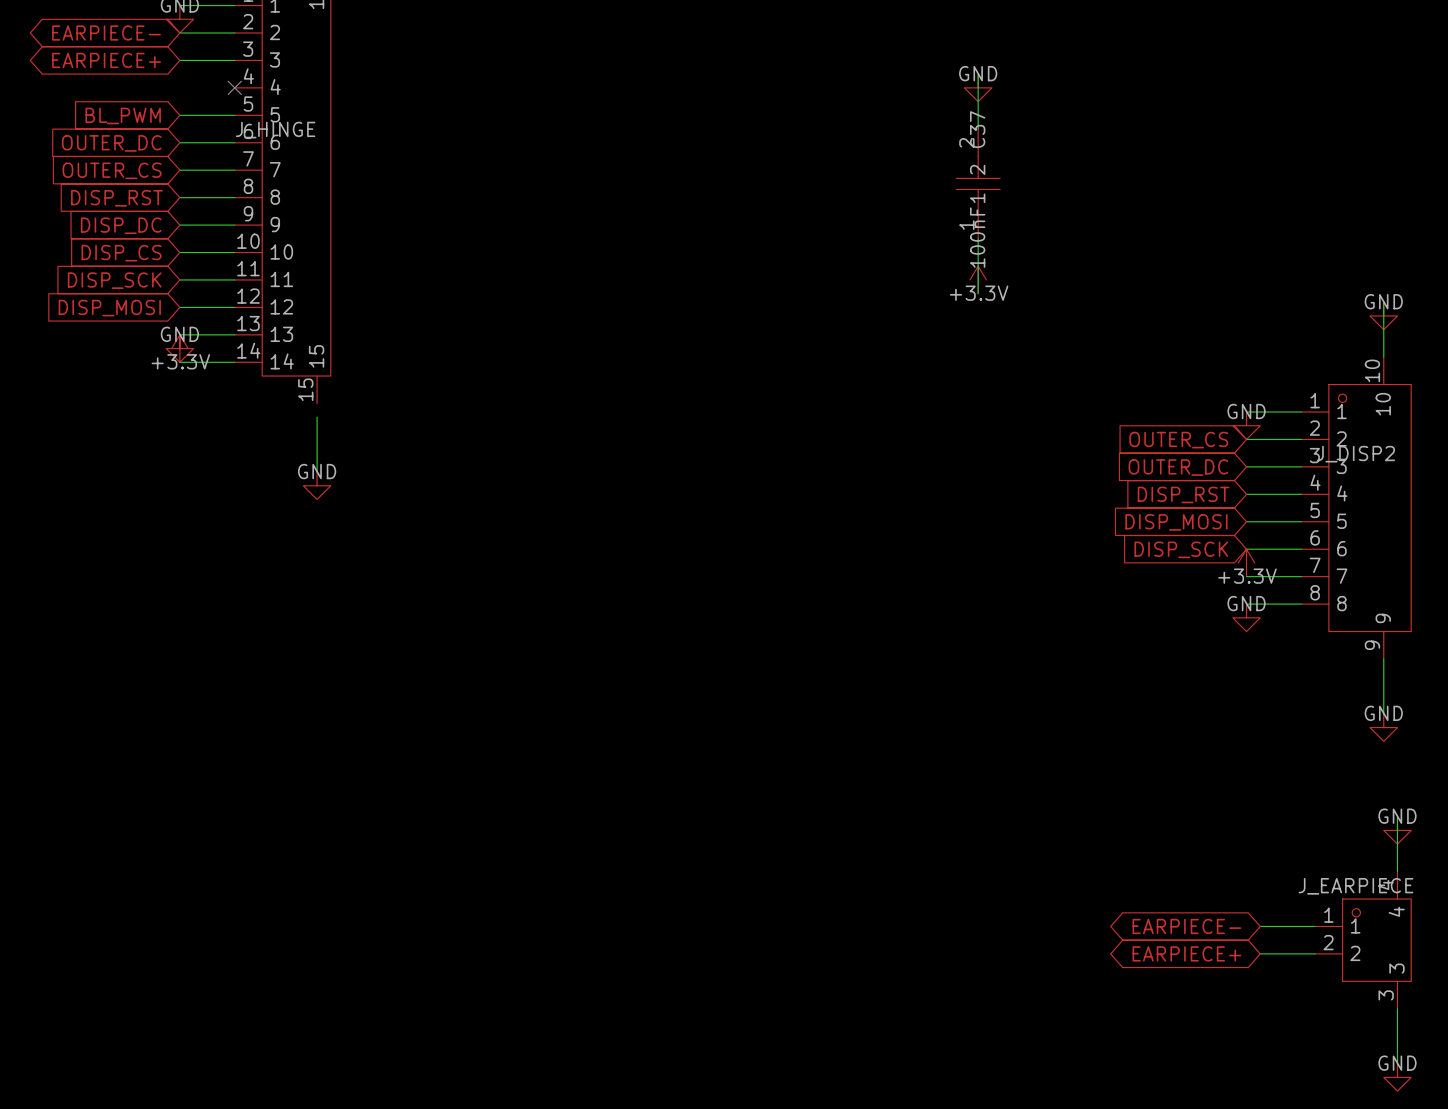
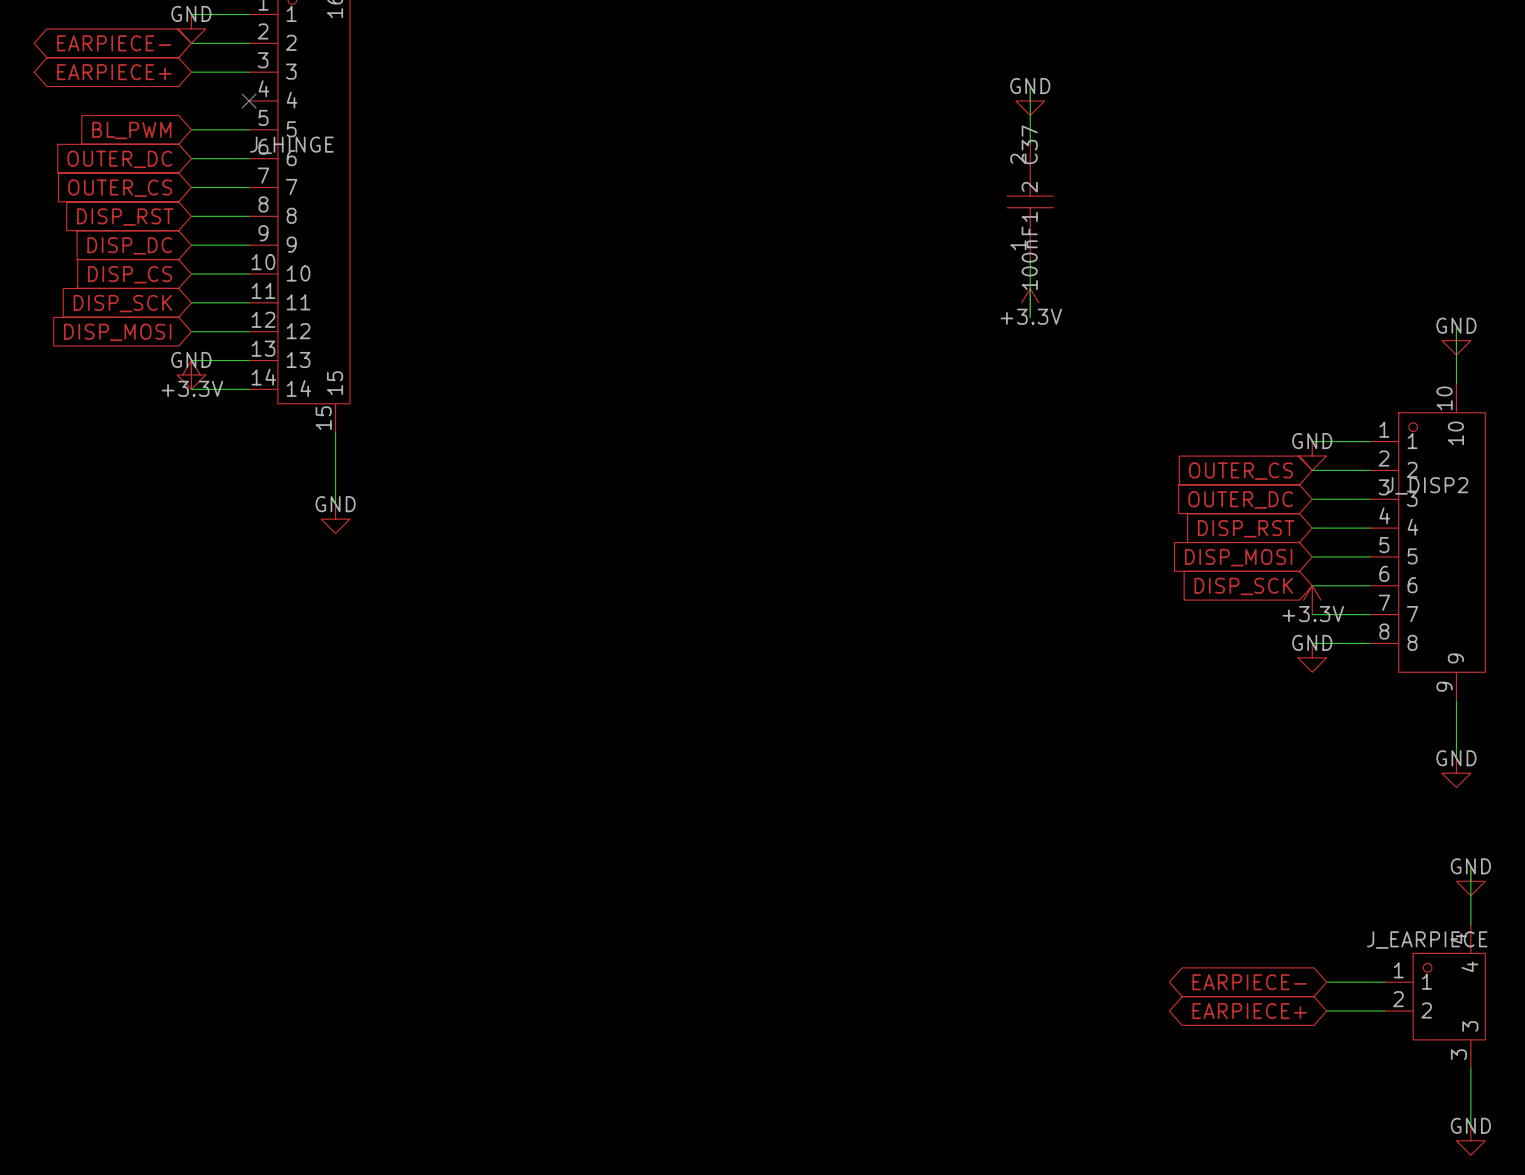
wire: none -> (335, 432) (335, 447)

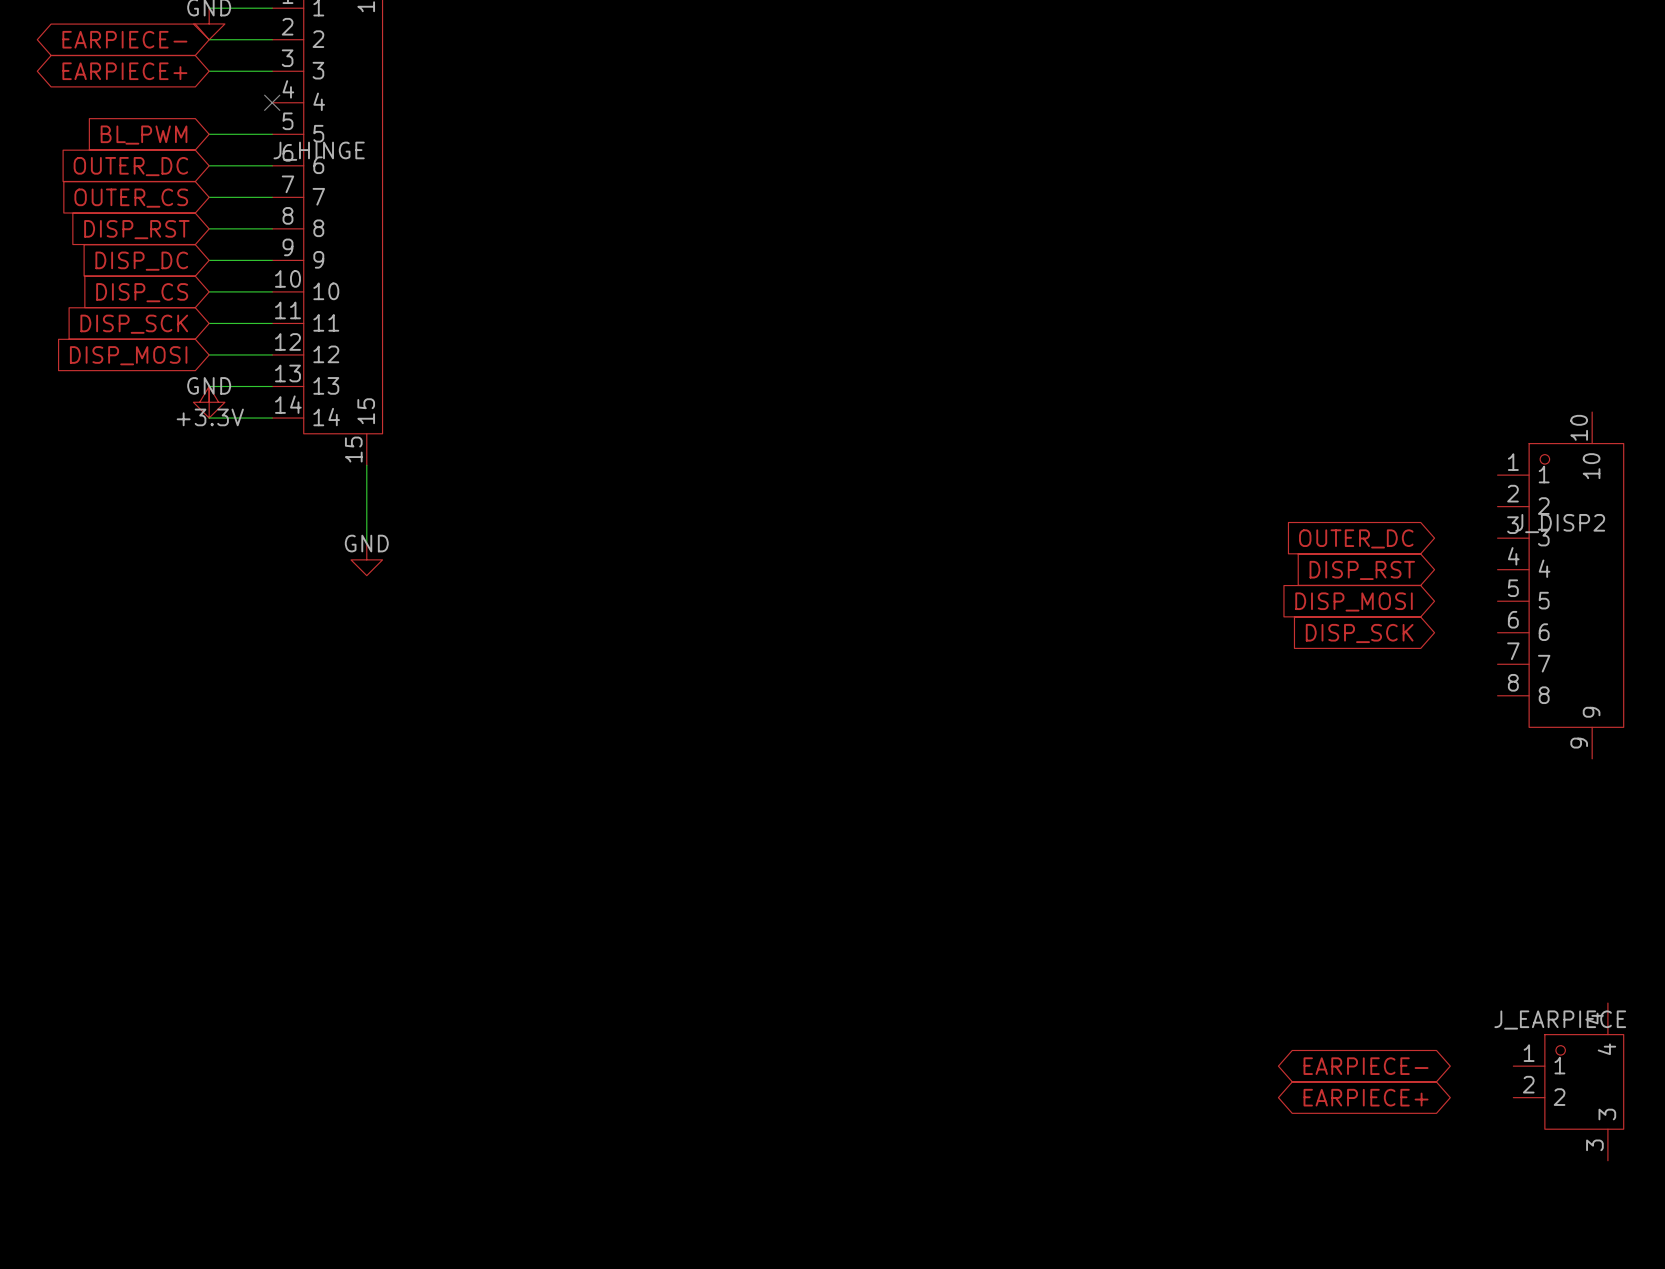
wire: (1030, 86) (1030, 144) -> none
power symbol: GND (1030, 101) -> none
C37: 100nF (1030, 201) -> none
wire: (1030, 259) (1030, 317) -> none
power symbol: +3.3V (1030, 302) -> none
wire: (1456, 326) (1456, 383) -> none
power symbol: GND (1456, 340) -> none
wire: (1312, 441) (1369, 441) -> none
power symbol: GND (1312, 456) -> none
wire: (1312, 470) (1369, 470) -> none
global label: OUTER_CS (1241, 471) -> none
wire: (1312, 499) (1369, 499) -> none
wire: (1312, 528) (1369, 528) -> none
wire: (1312, 556) (1369, 556) -> none
wire: (1312, 585) (1369, 585) -> none
power symbol: +3.3V (1312, 600) -> none
wire: (1312, 614) (1369, 614) -> none
wire: (1312, 643) (1369, 643) -> none
power symbol: GND (1312, 657) -> none
wire: (1456, 701) (1456, 758) -> none
power symbol: GND (1456, 773) -> none
wire: (1470, 866) (1470, 924) -> none
power symbol: GND (1470, 881) -> none
wire: (1326, 982) (1384, 982) -> none
wire: (1326, 1011) (1384, 1011) -> none
wire: (1470, 1068) (1470, 1126) -> none
power symbol: GND (1470, 1140) -> none

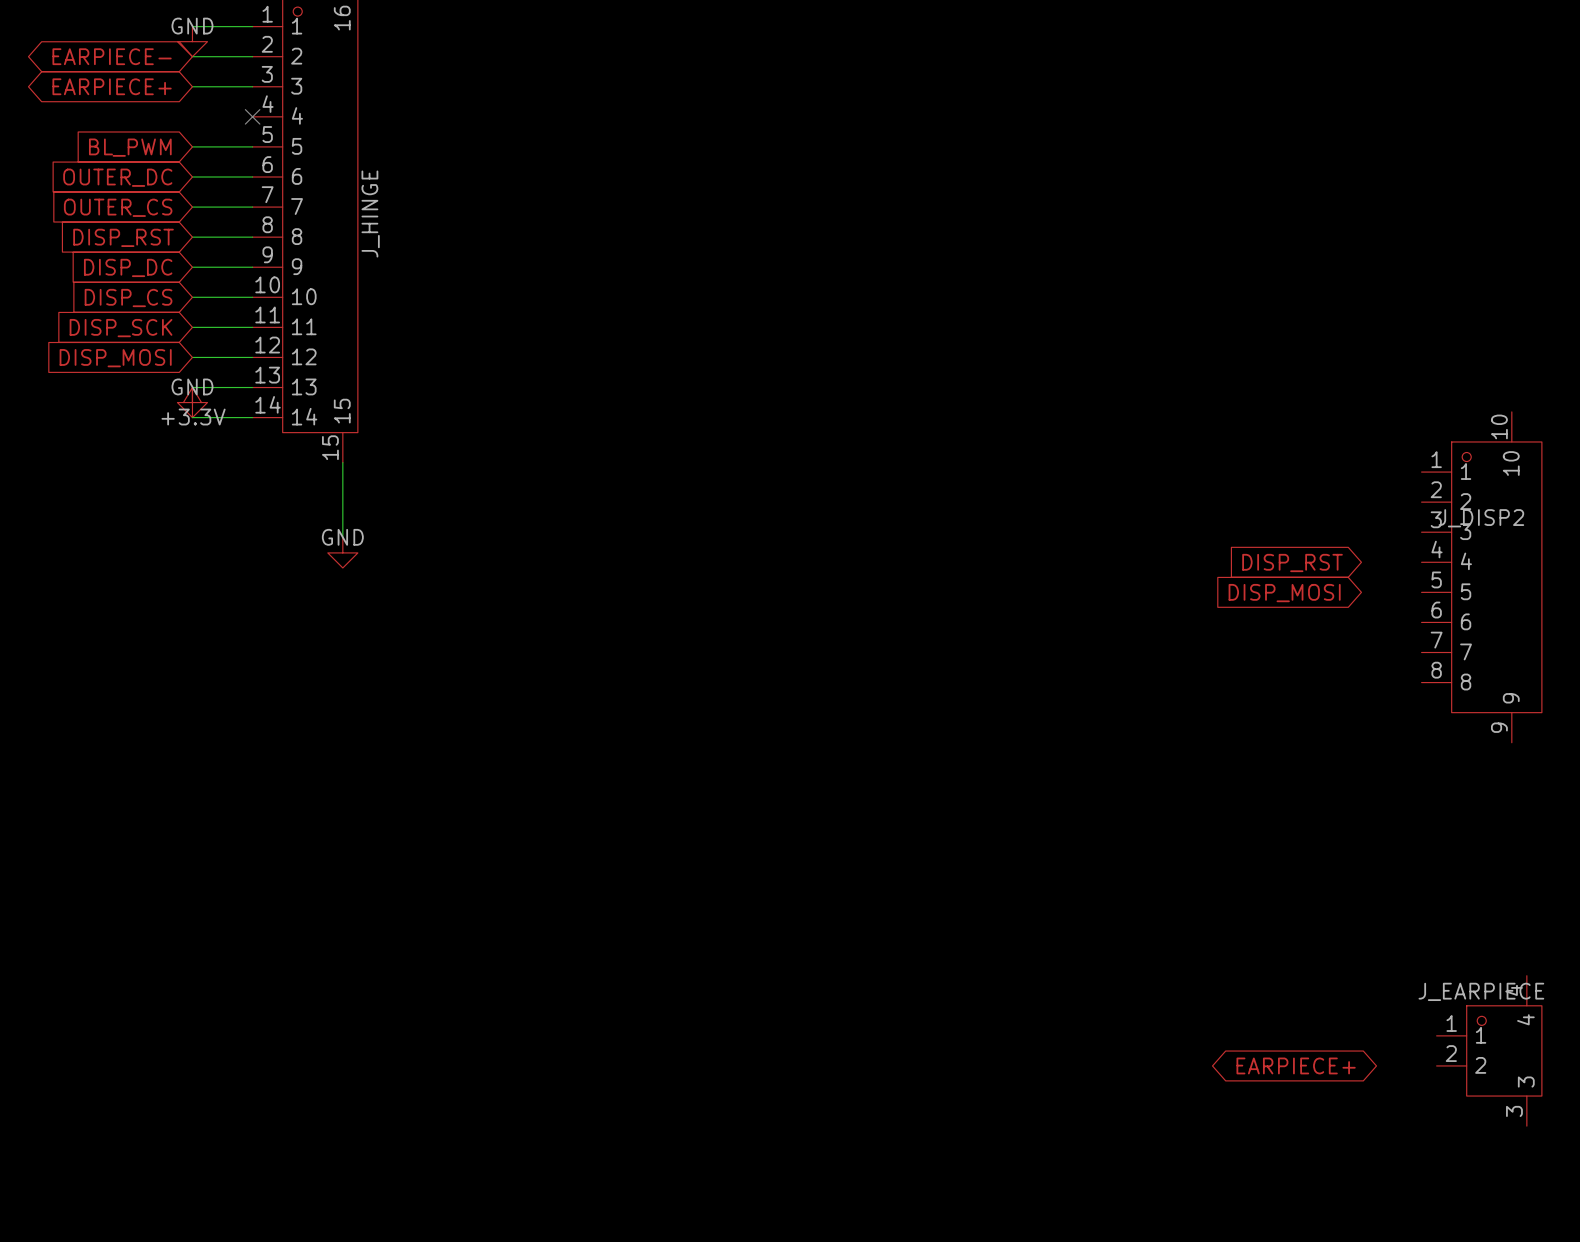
J_HINGE name rotation: 0° (319, 151) -> 90° counterclockwise (370, 214)
global label: OUTER_DC (1356, 538) -> none
global label: DISP_SCK (1359, 633) -> none
global label: EARPIECE- (1366, 1066) -> none

